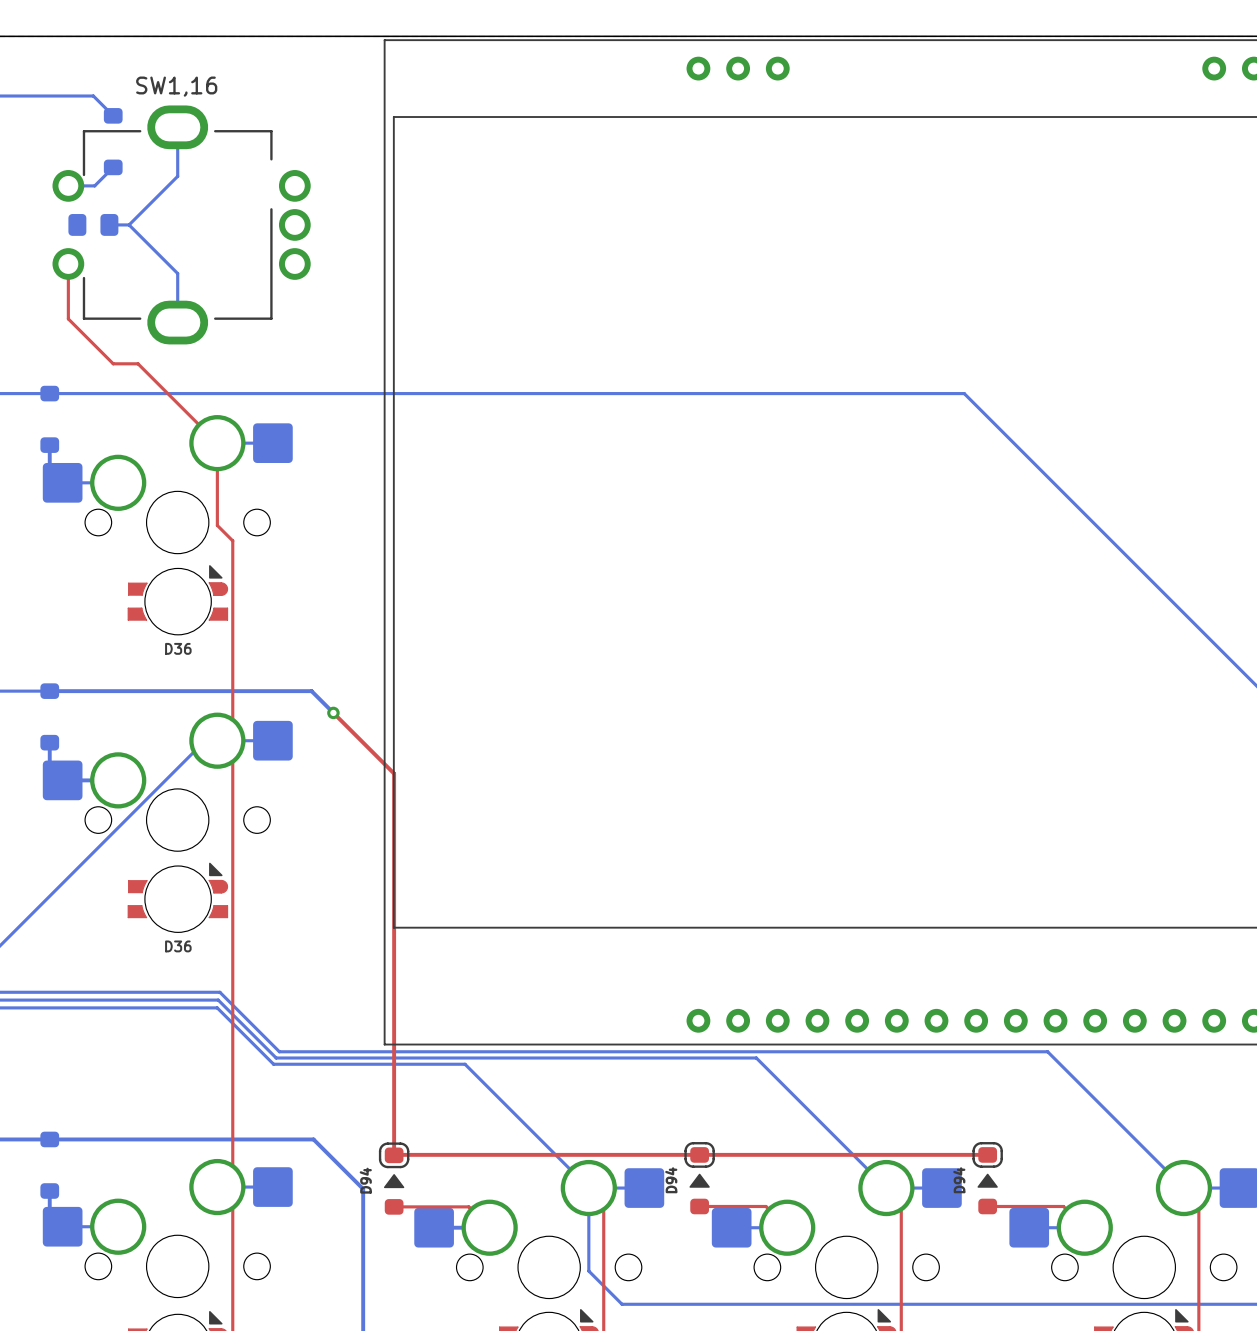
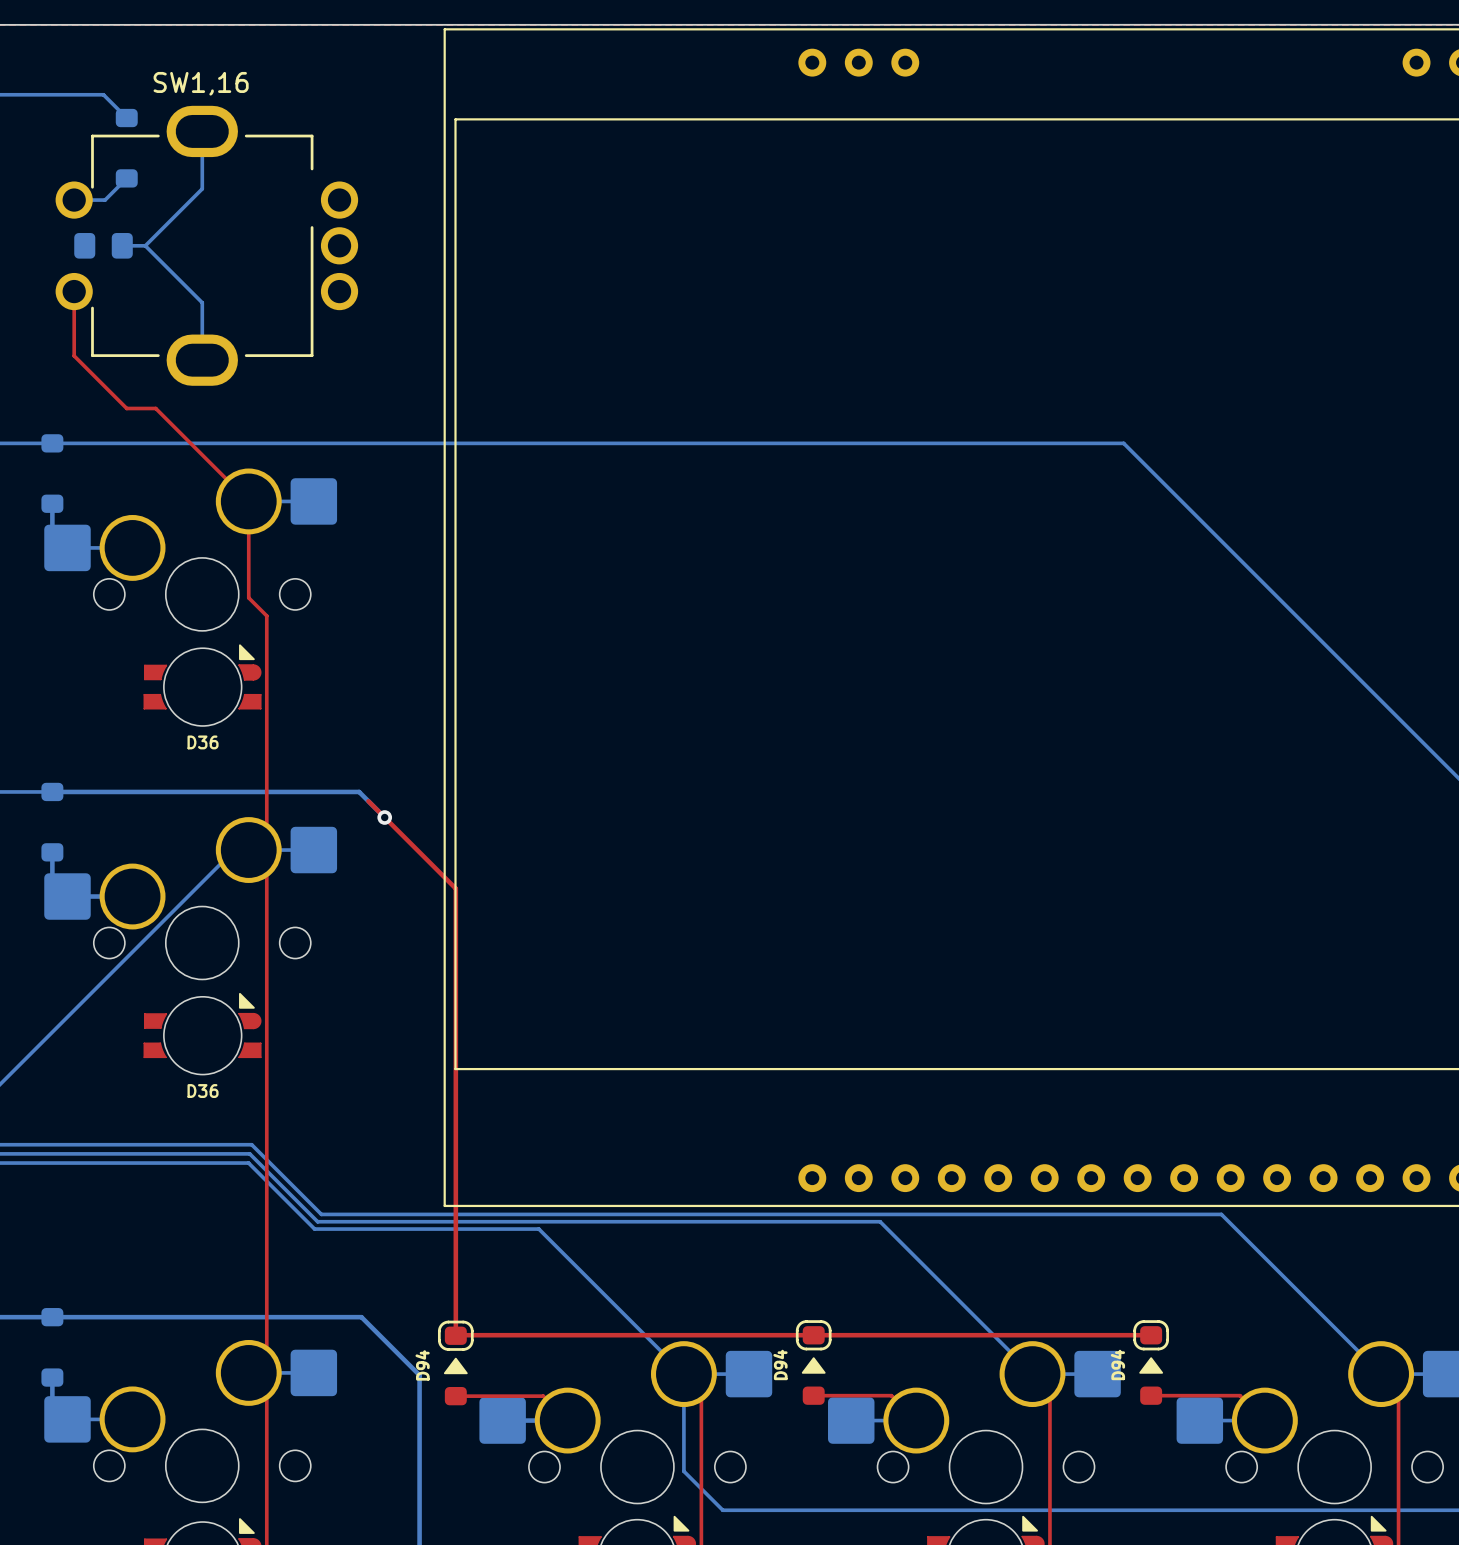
top track: none -> (368, 801) (384, 817)

